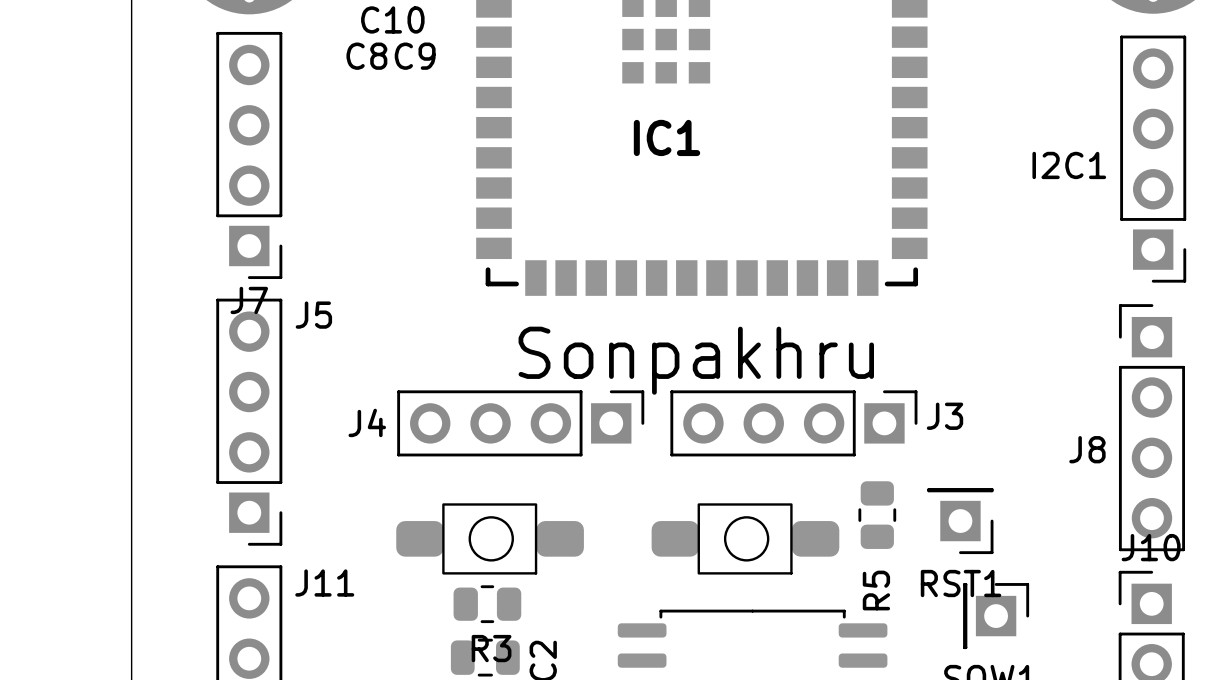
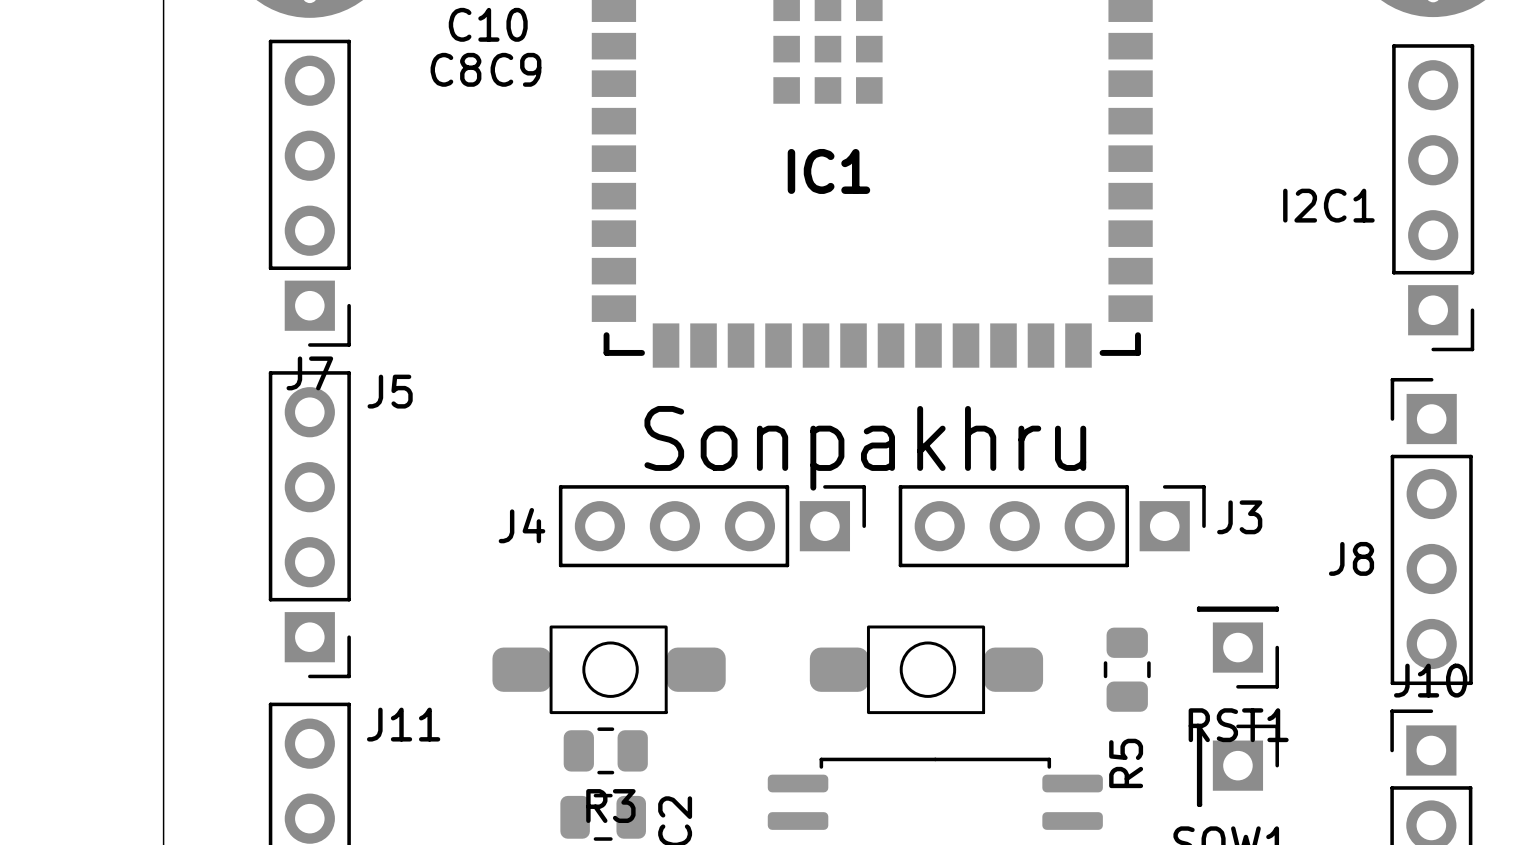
J3 position: (520, 423) -> (712, 526)
J4 position: (793, 423) -> (1052, 526)
R5 position: (877, 515) -> (1127, 669)
RST1 position: (960, 521) -> (1237, 647)

